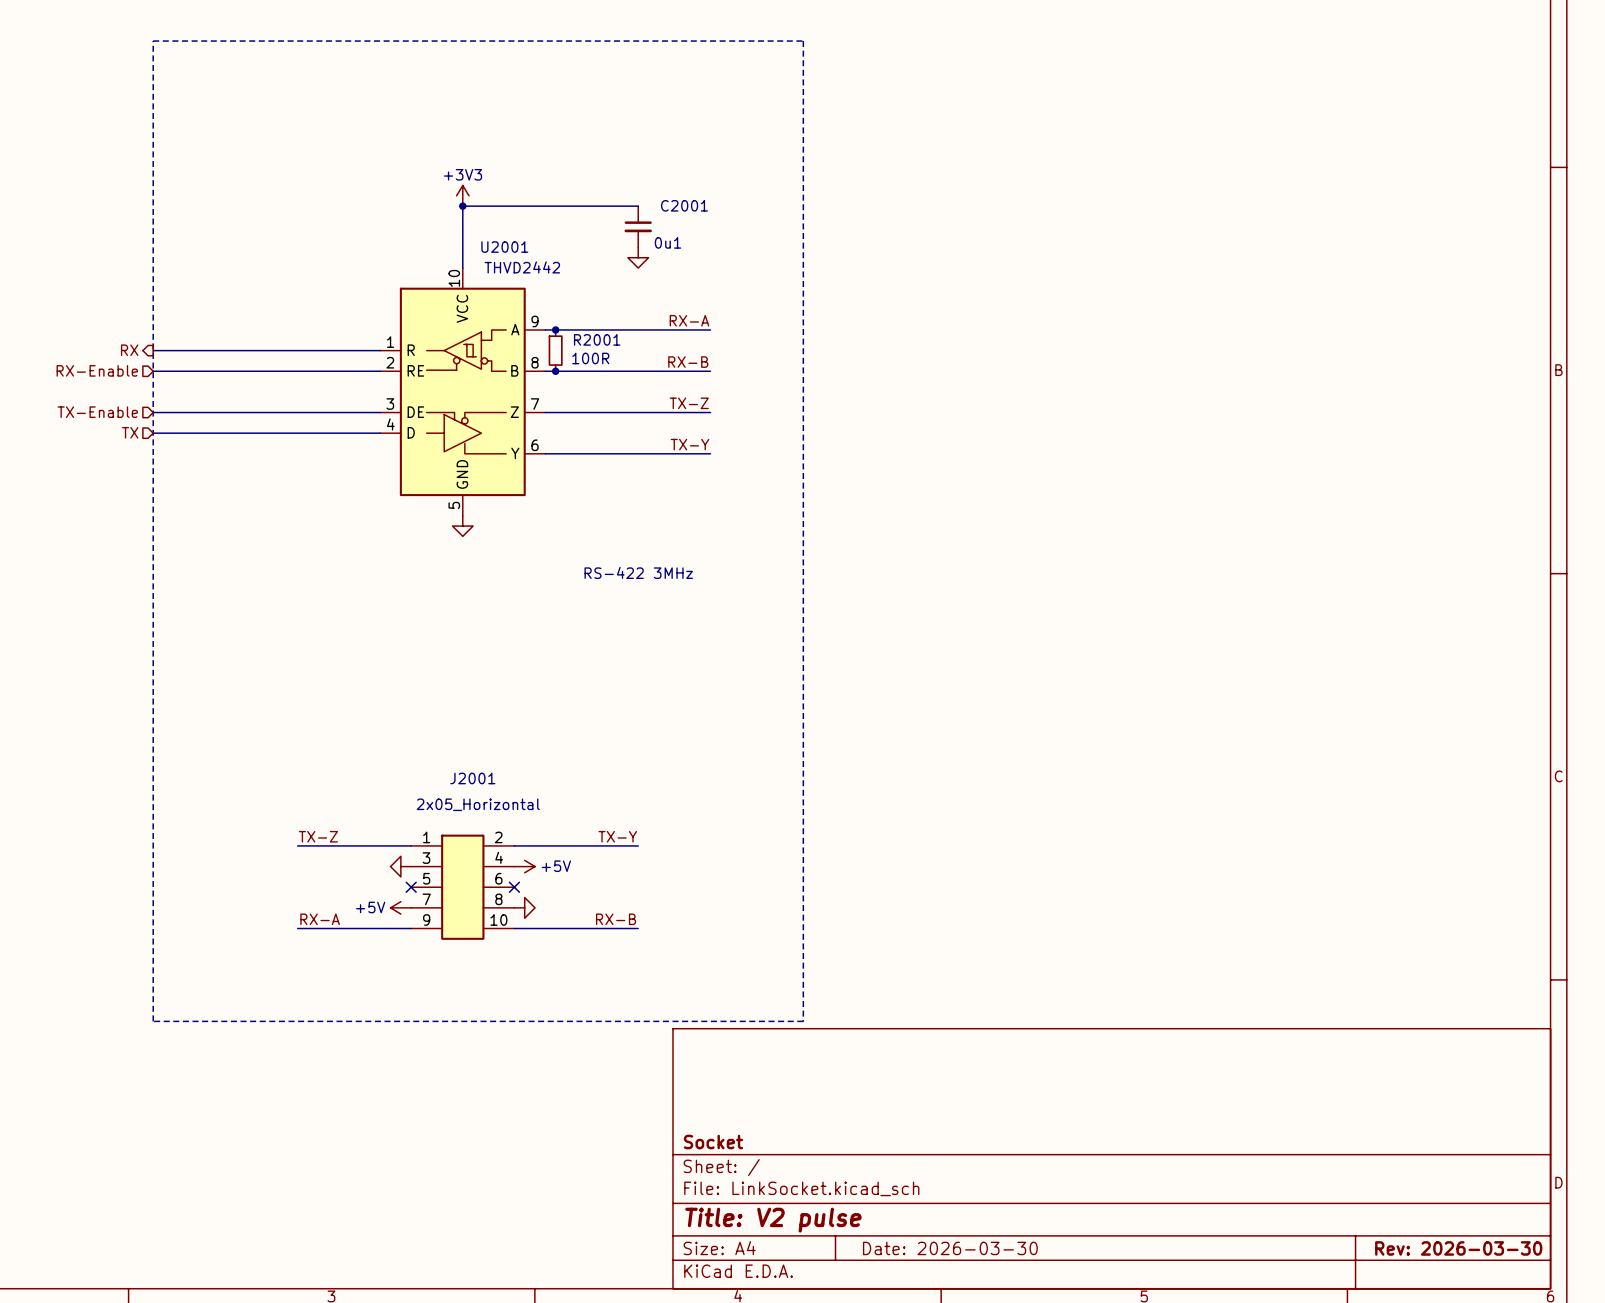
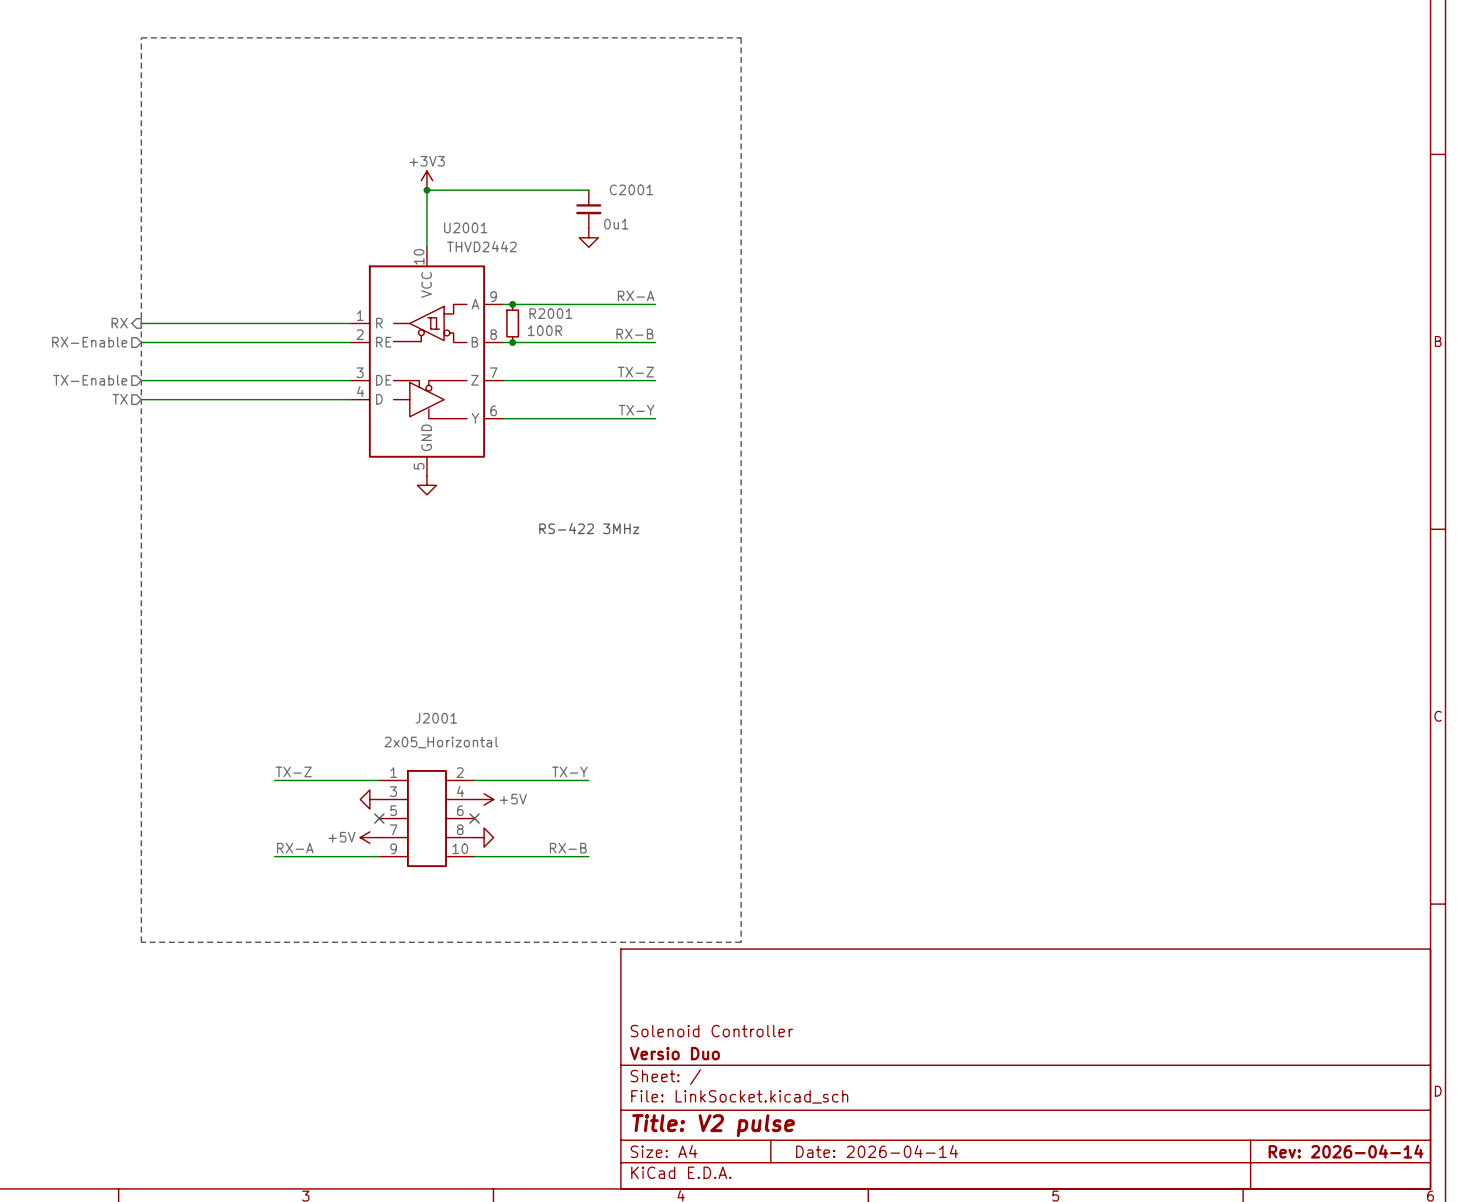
title block: none -> Solenoid Controller (711, 1031)
title block: Socket (713, 1142) -> Versio Duo (674, 1053)
title block: Date: 2026-03-30 (950, 1248) -> Date: 2026-04-14 (877, 1151)
title block: Rev: 2026-03-30 (1458, 1248) -> Rev: 2026-04-14 (1346, 1151)

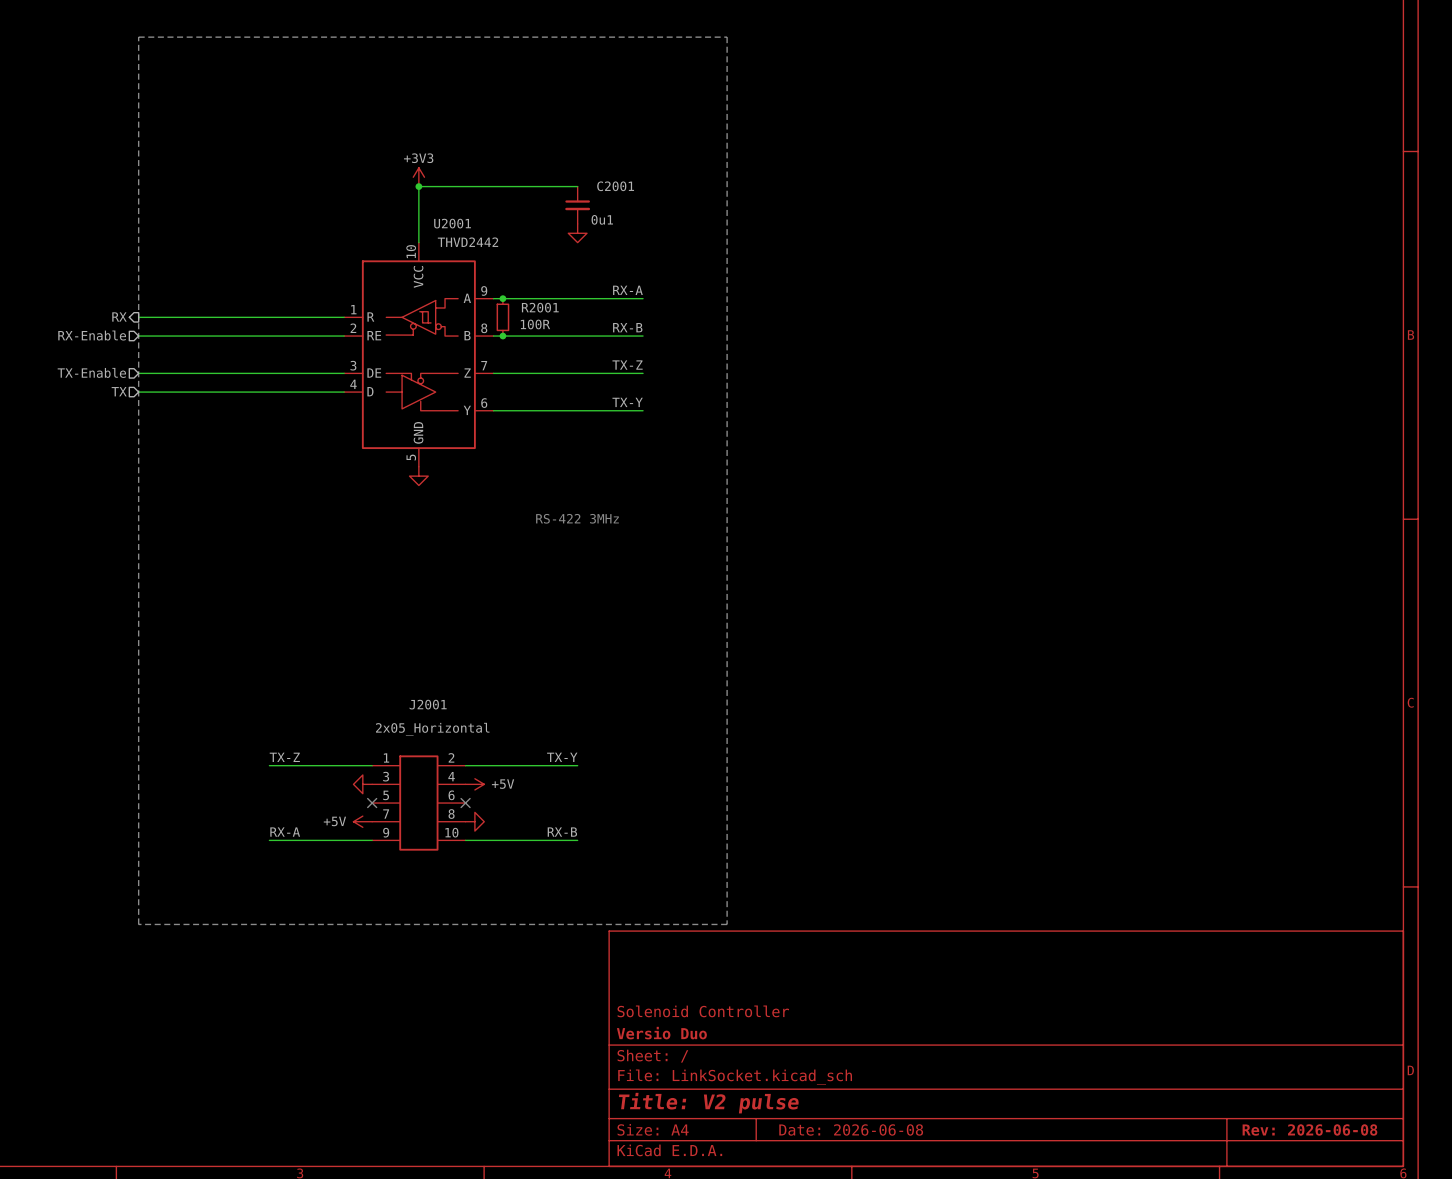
title block: Date: 2026-04-14 (877, 1151) -> Date: 2026-06-08 (851, 1129)
title block: Rev: 2026-04-14 (1346, 1151) -> Rev: 2026-06-08 (1309, 1129)

